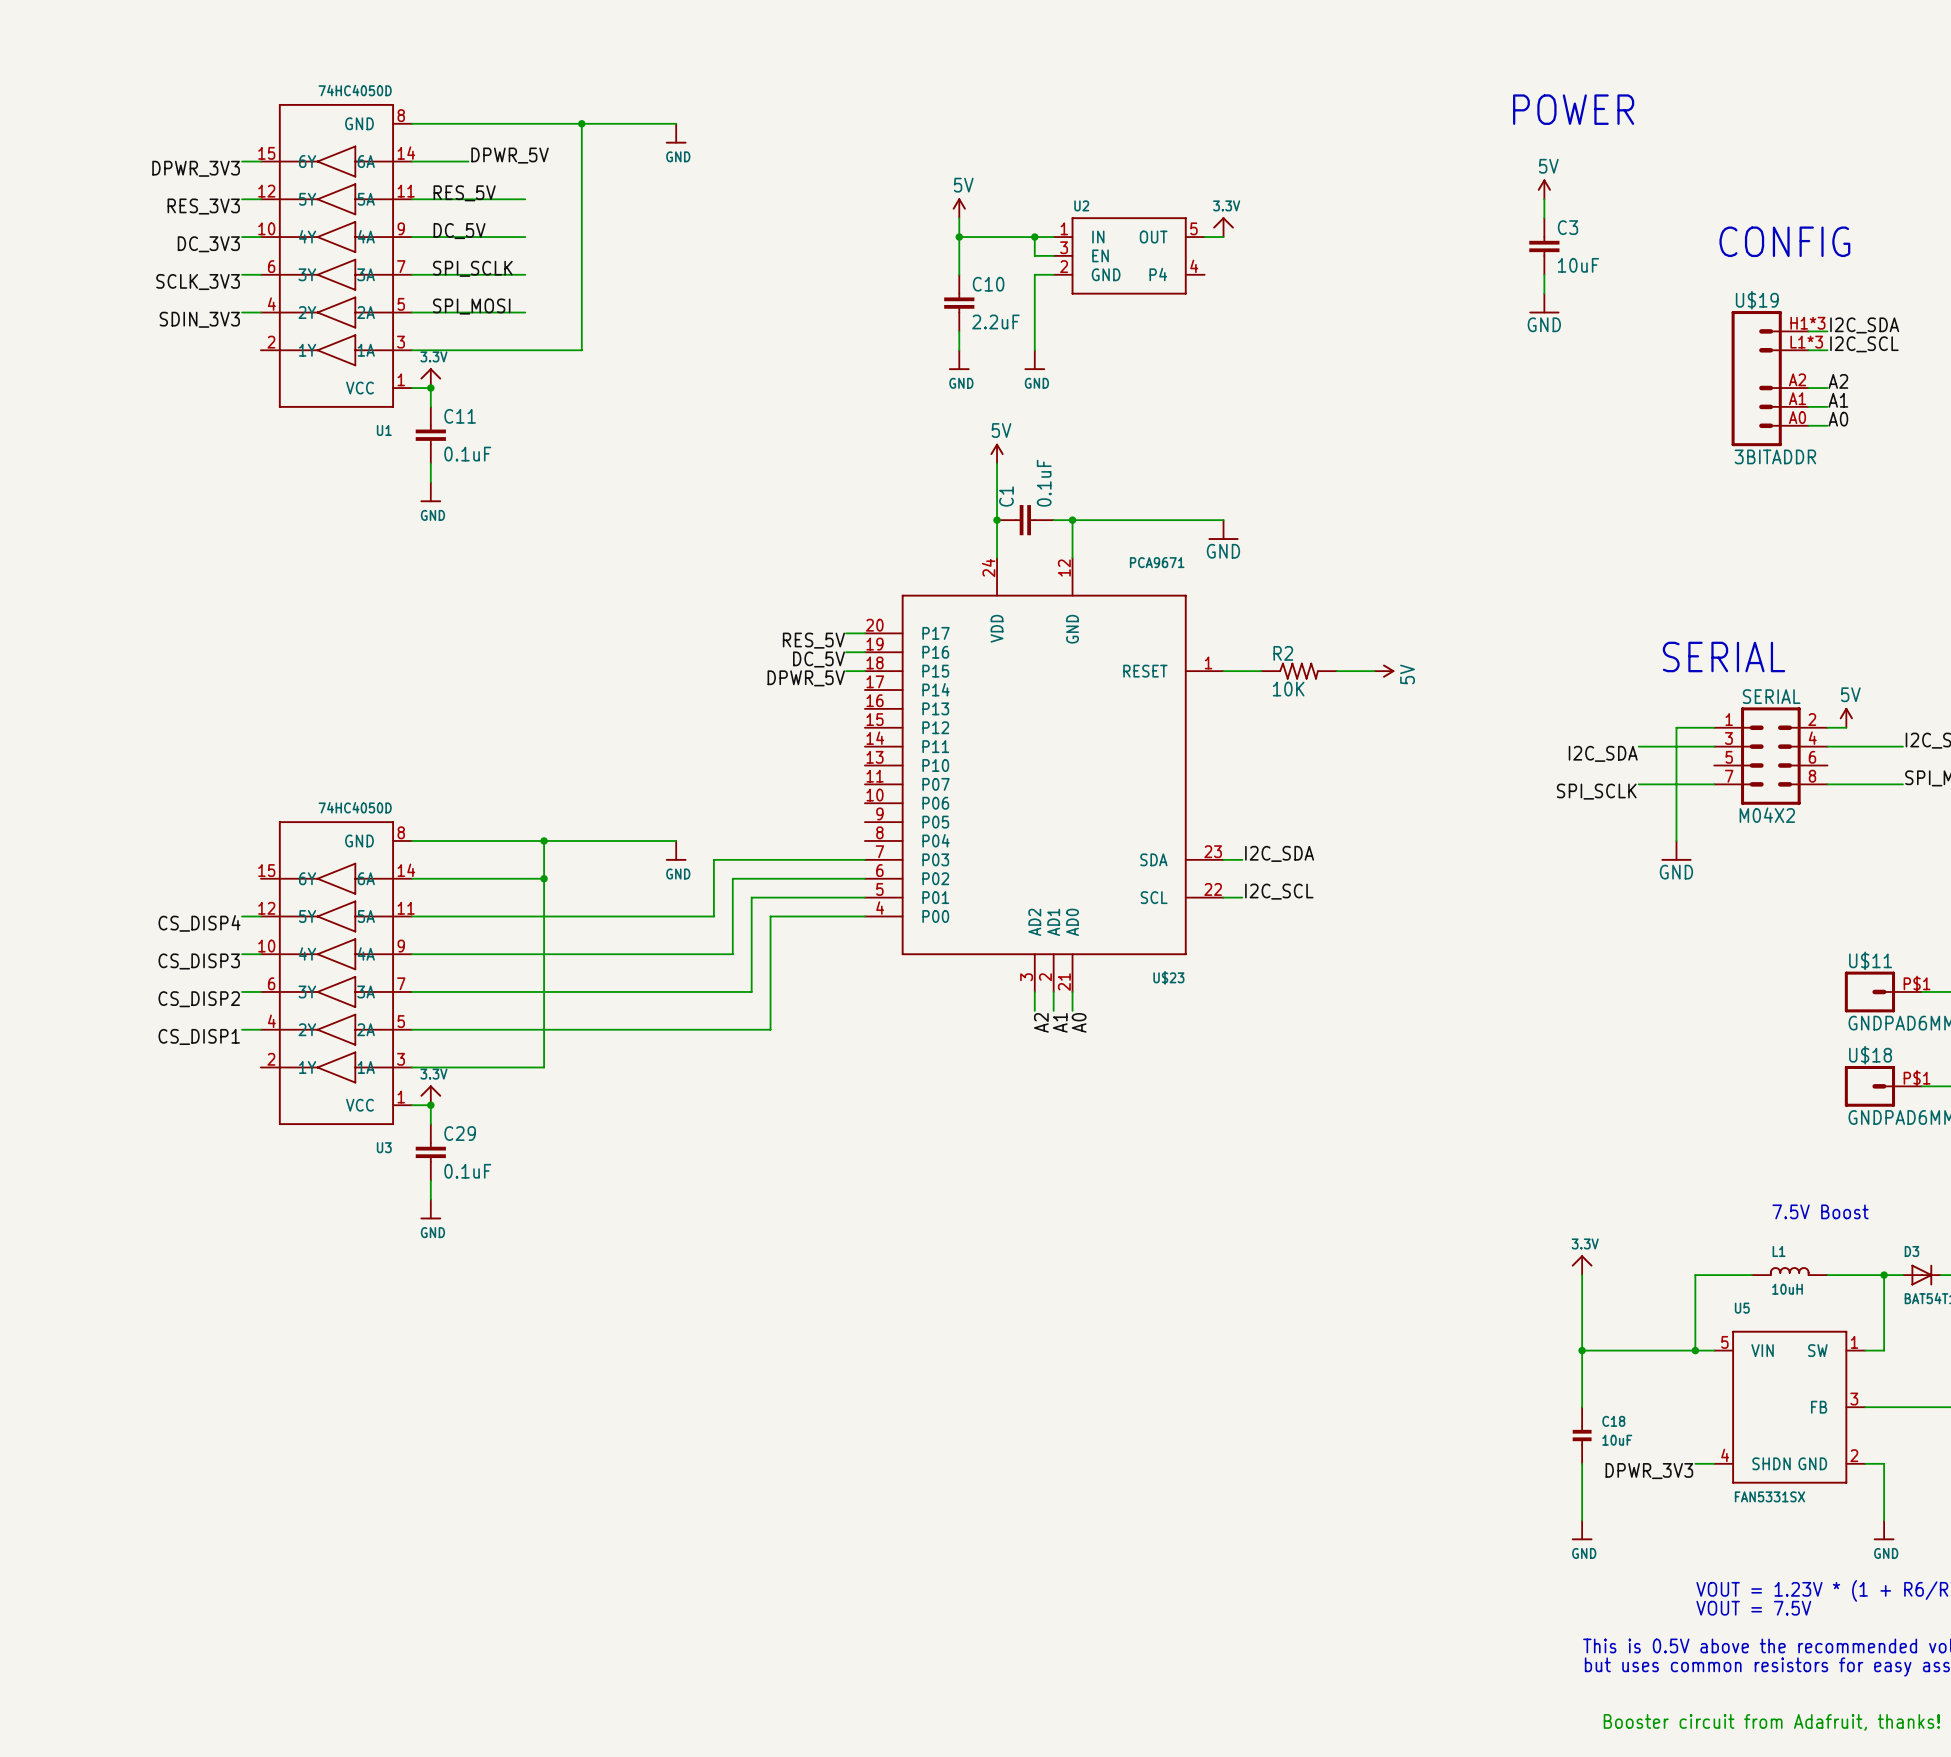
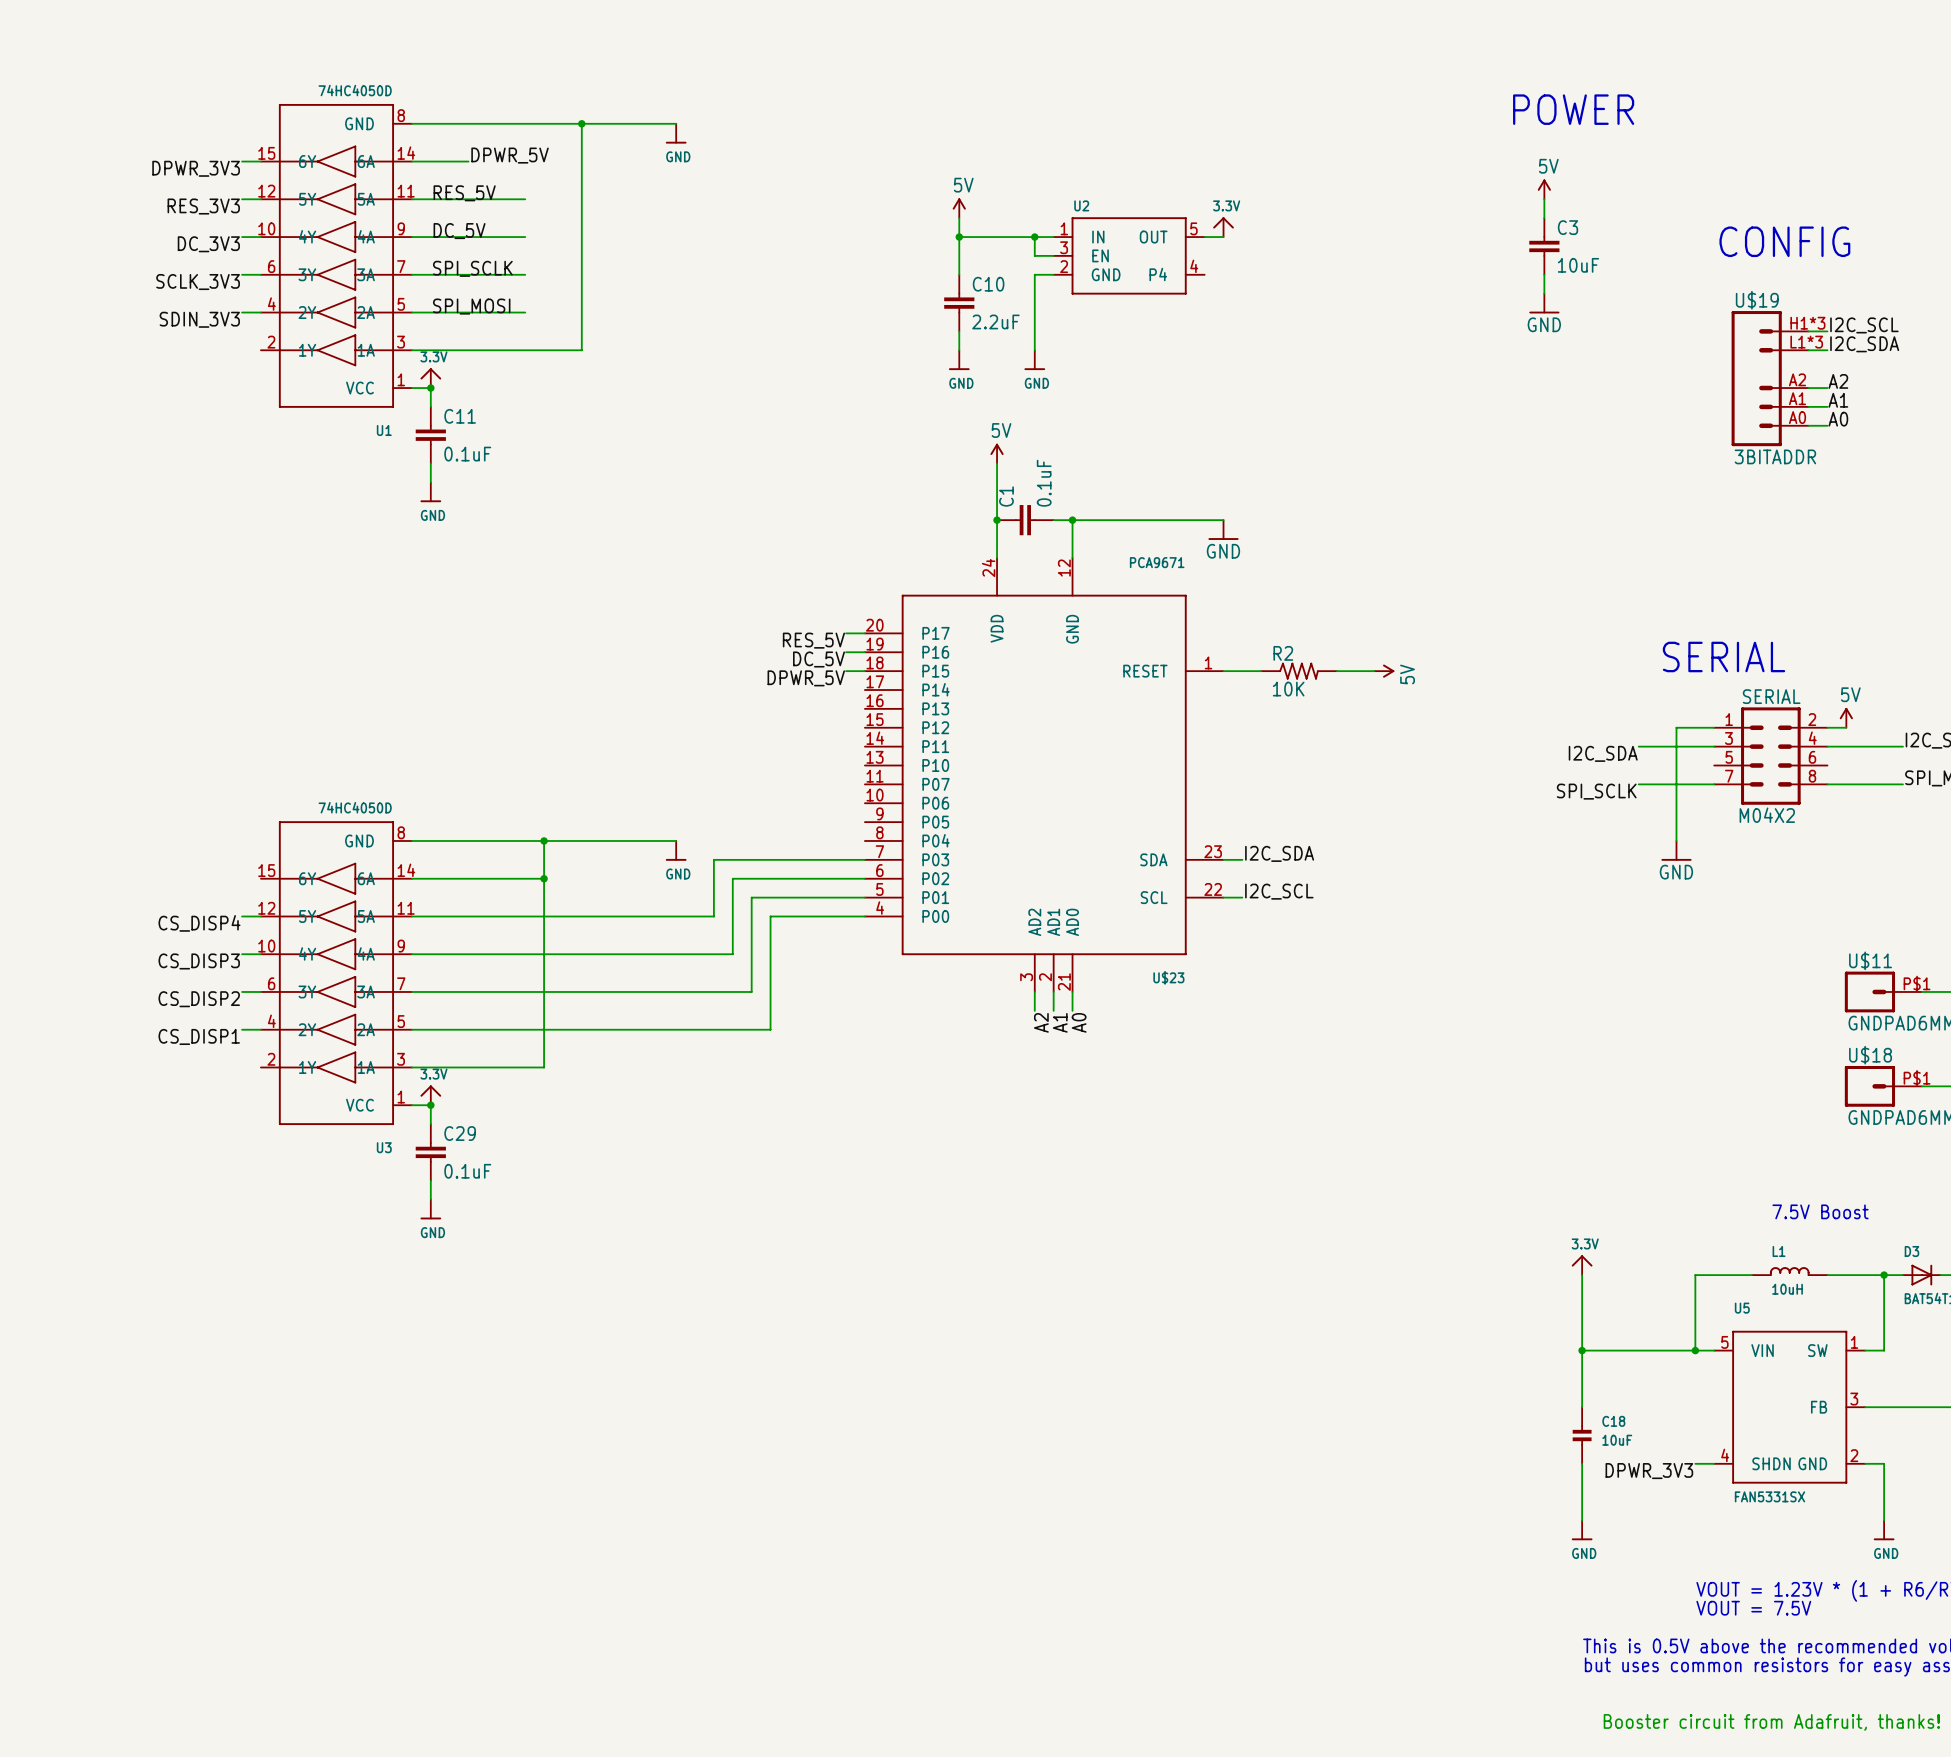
label: I2C_SDA (1864, 325) -> I2C_SCL (1864, 325)
label: I2C_SCL (1864, 344) -> I2C_SDA (1864, 344)

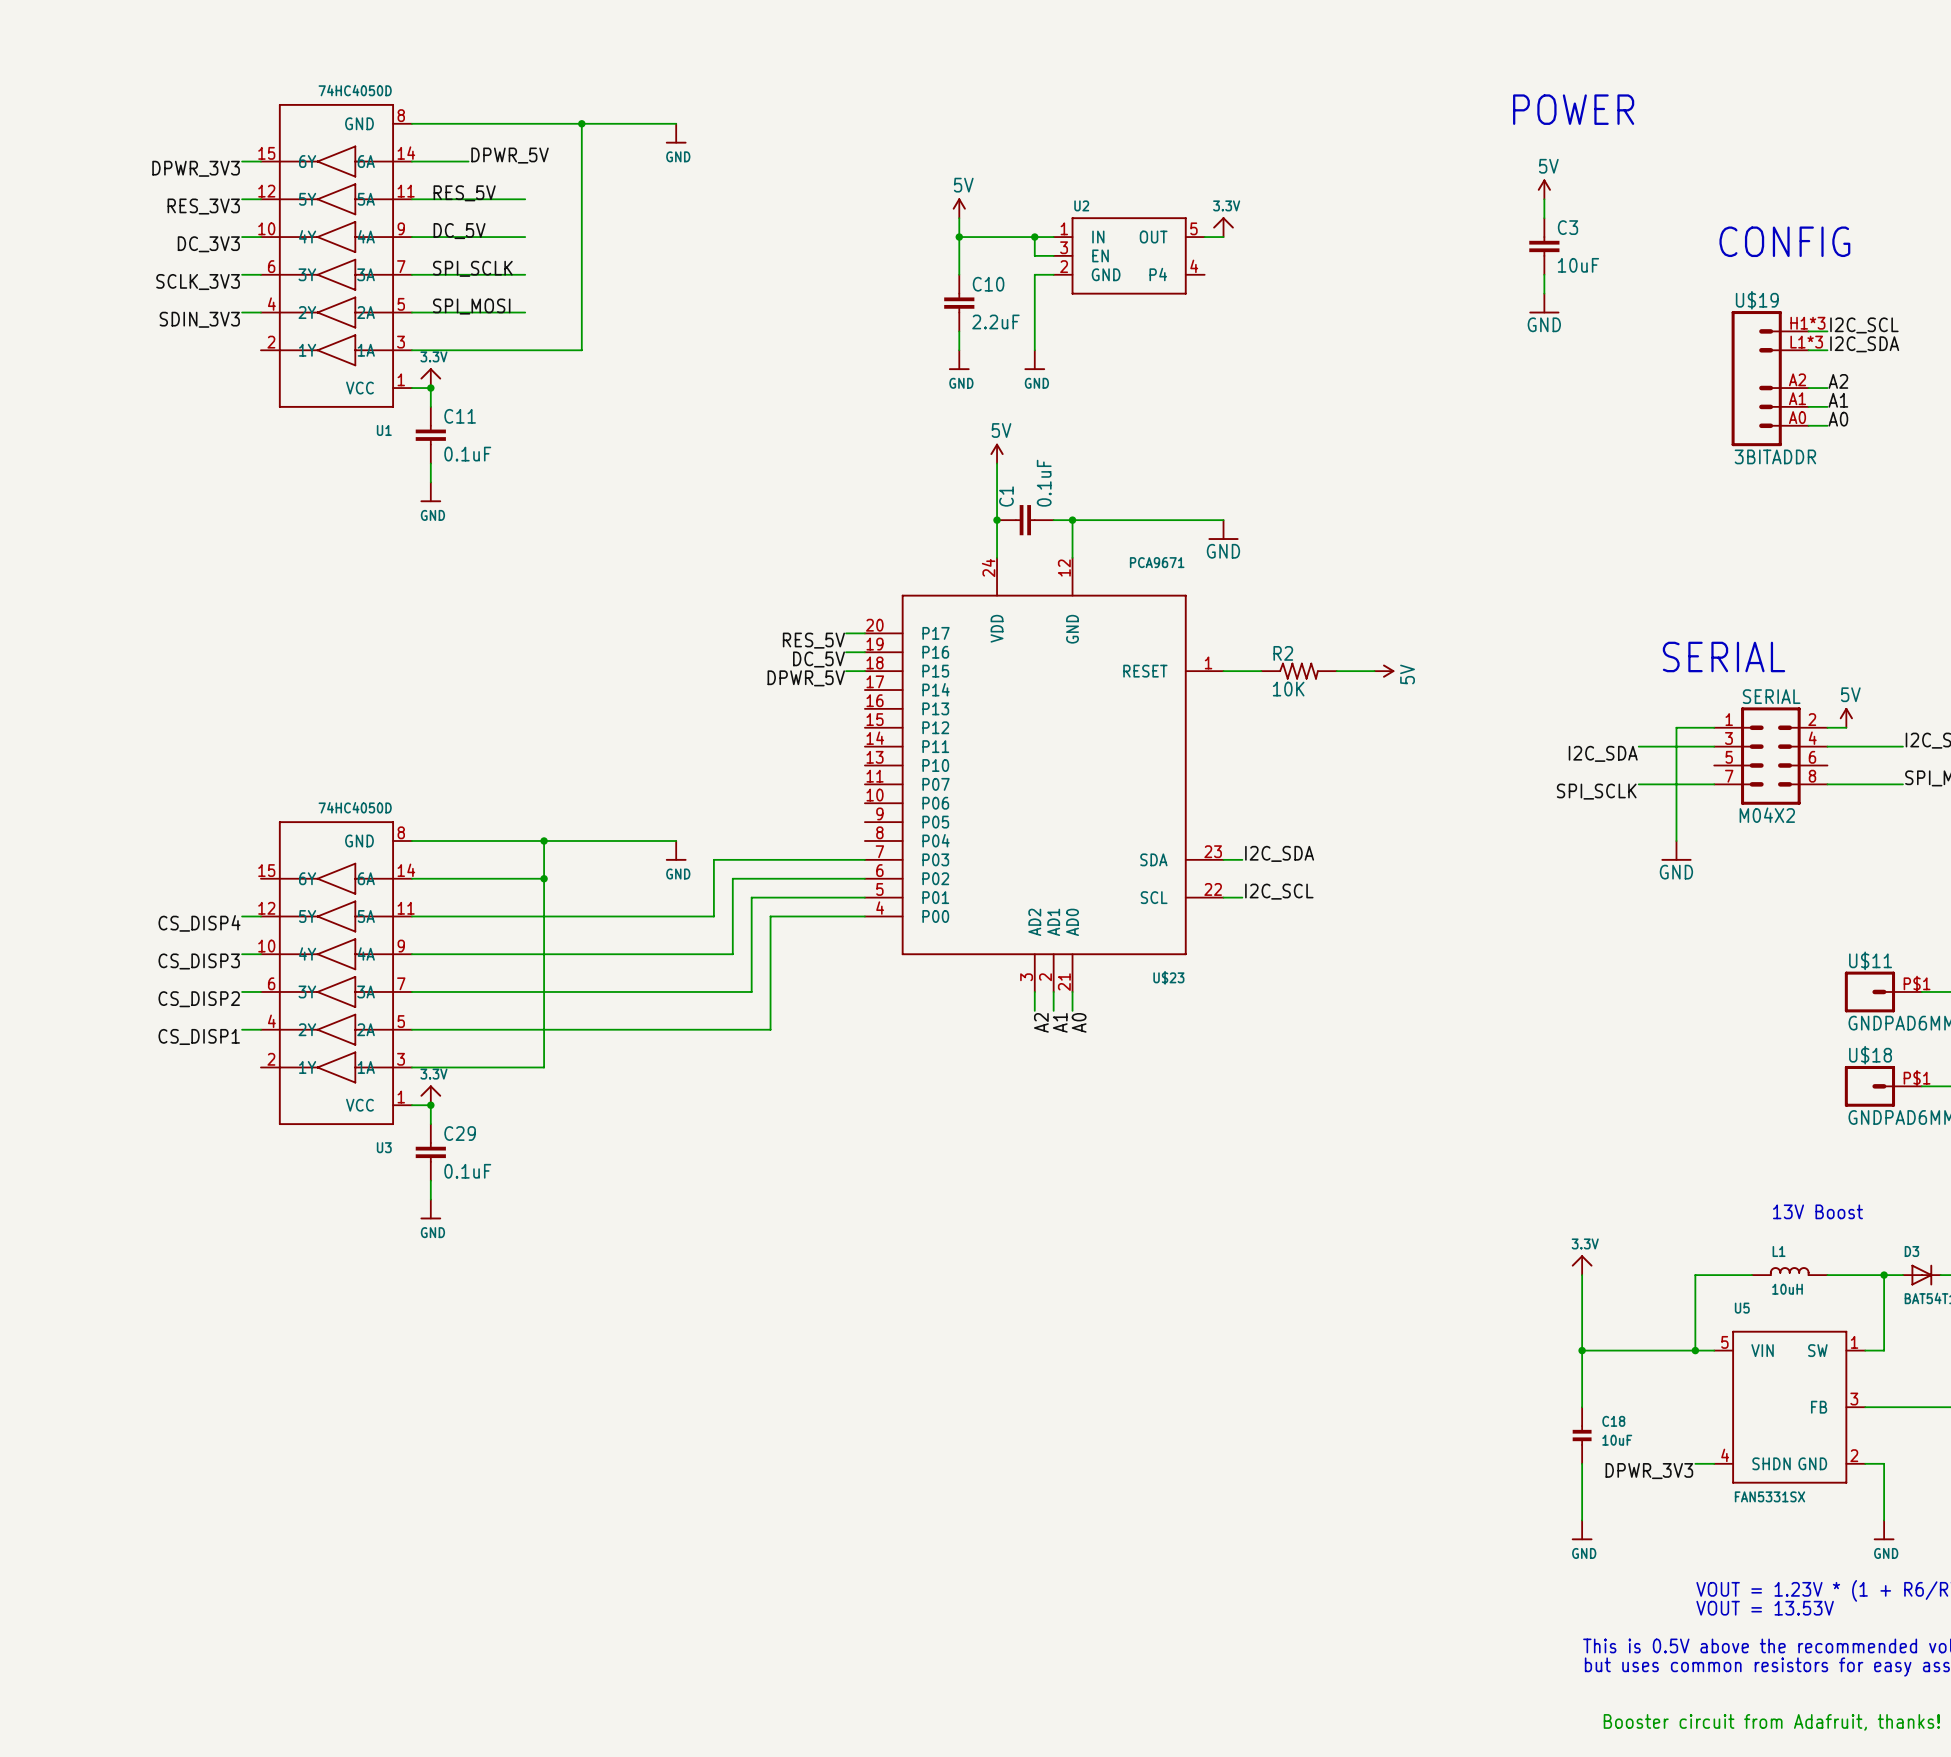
text: 7.5V Boost (1820, 1211) -> 13V Boost (1817, 1211)
text: VOUT = 7.5V (1753, 1608) -> VOUT = 13.53V (1765, 1608)

